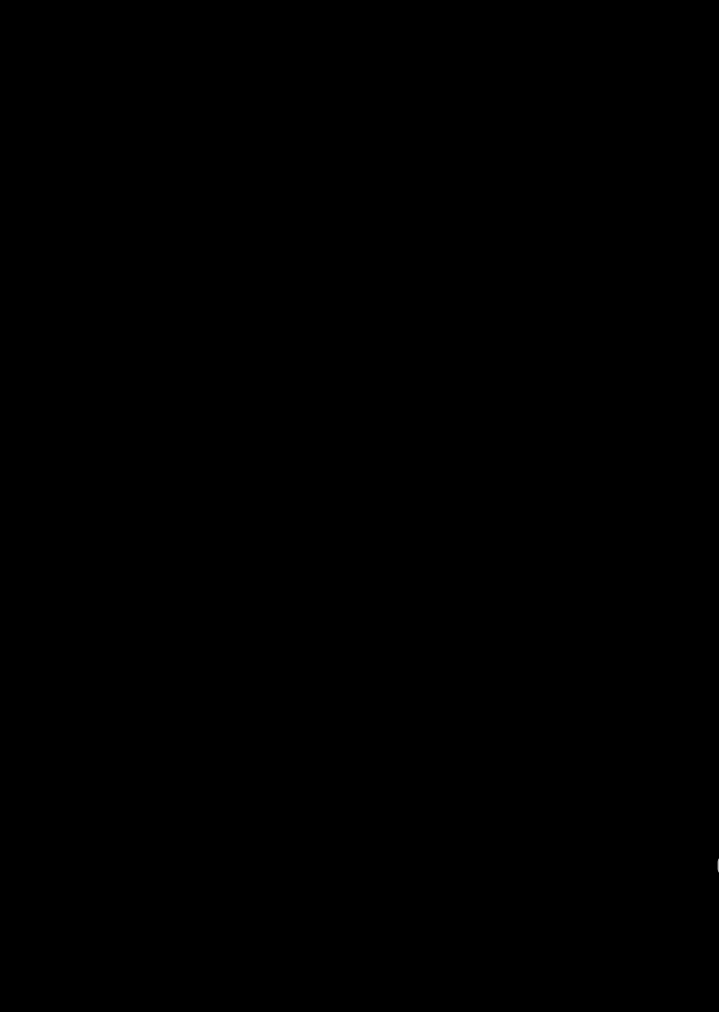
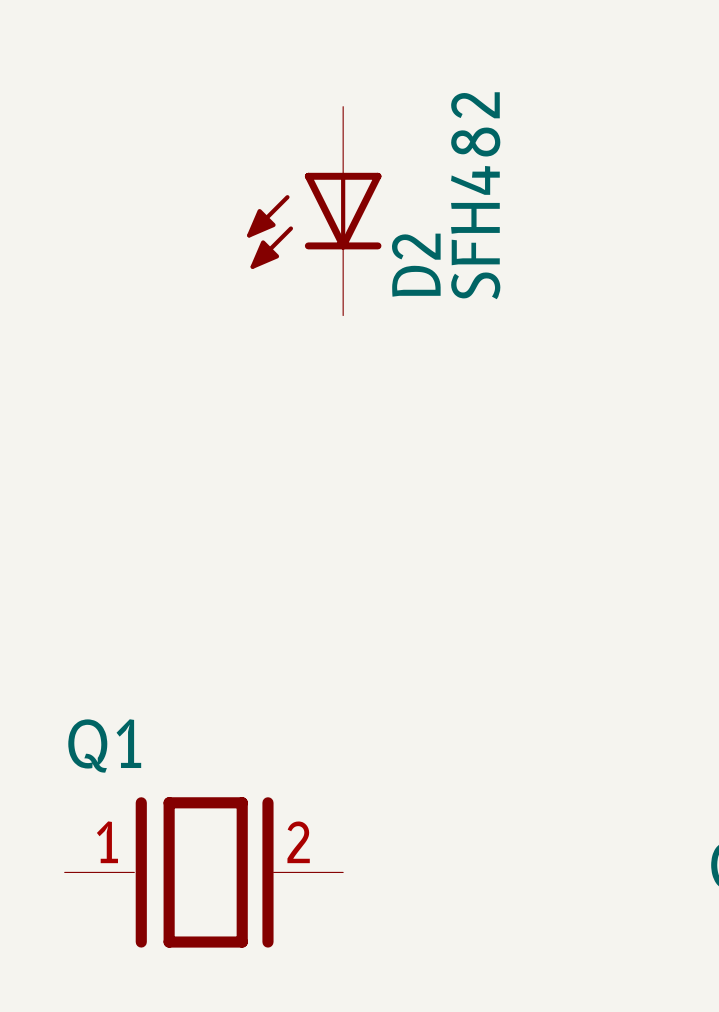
D2: none -> SFH482 (314, 211)
Q1: none -> (203, 872)

